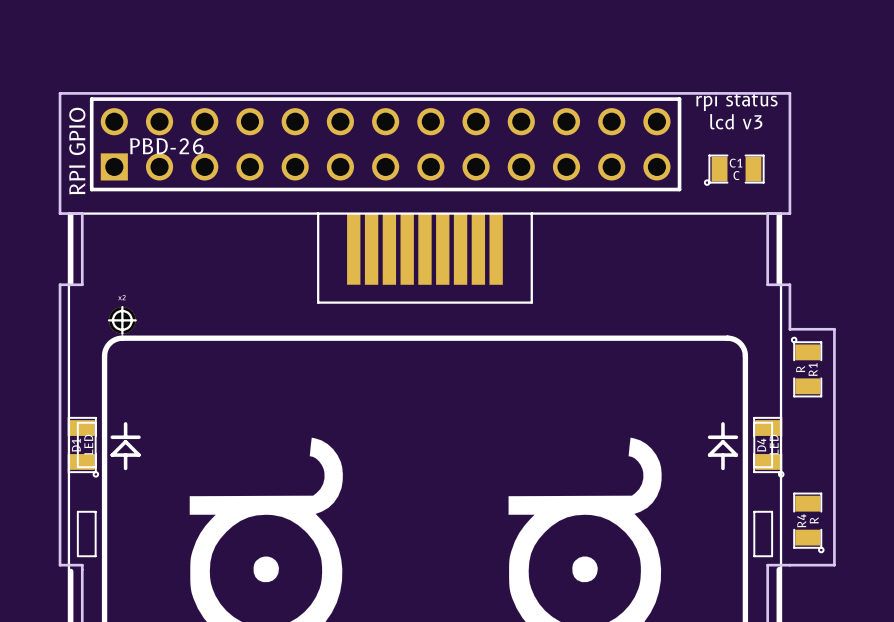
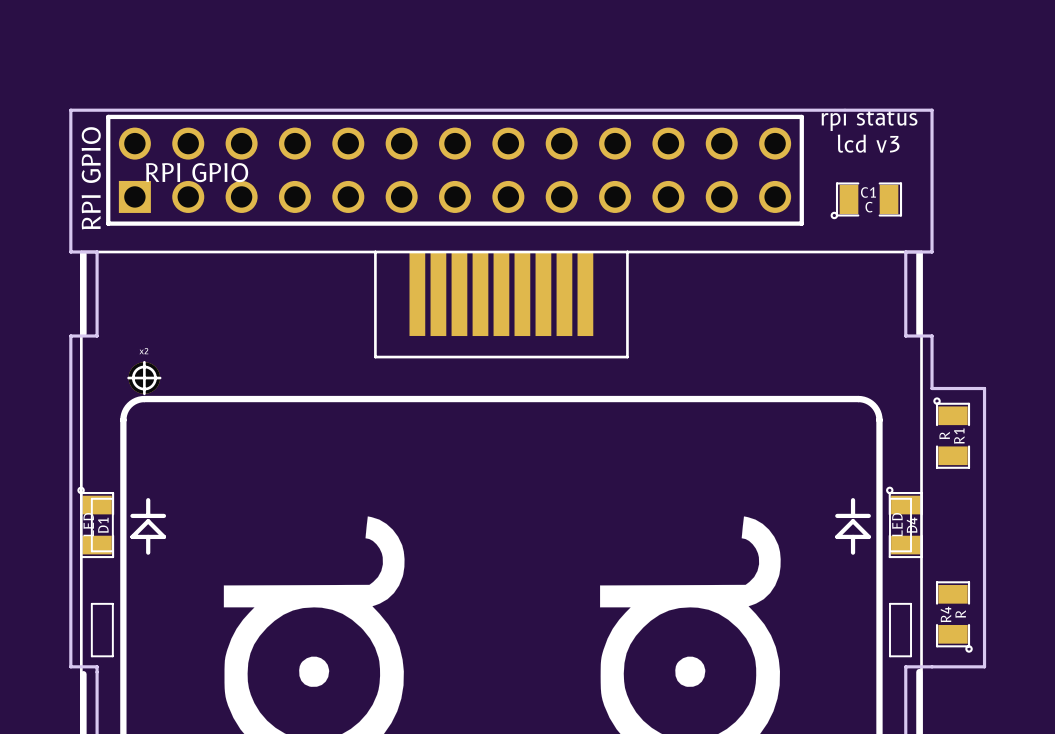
part value: PBD-26 (166, 146) -> RPI GPIO (197, 172)
D1 rotation: 0° (83, 447) -> 180° (95, 522)
D4 rotation: 0° (768, 447) -> 180° (904, 522)

